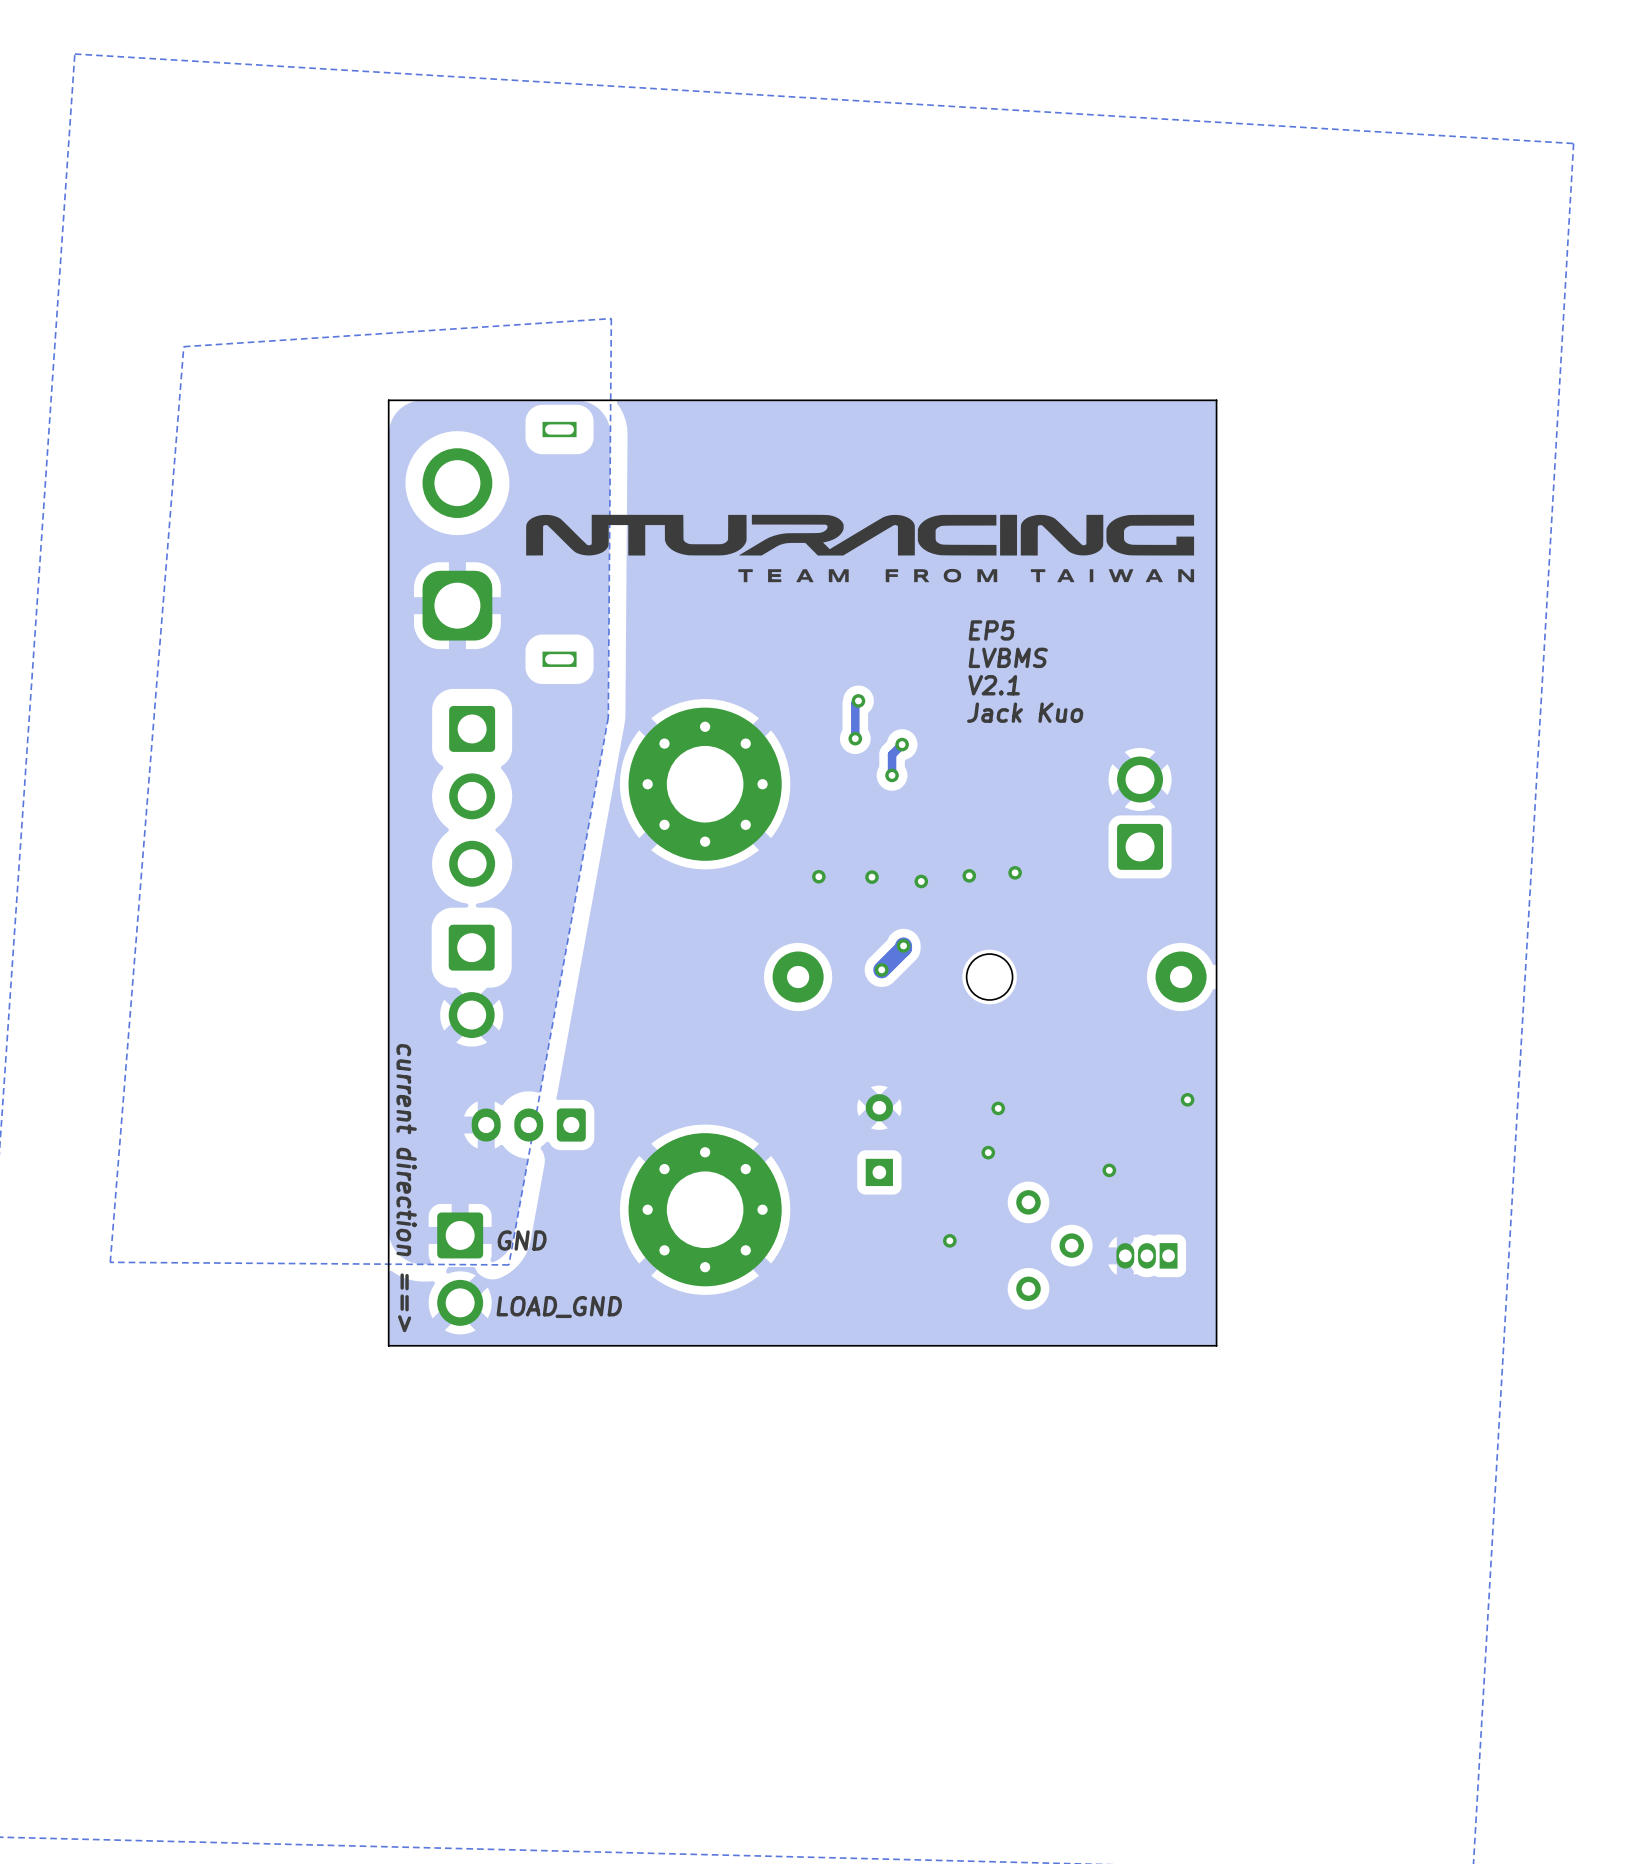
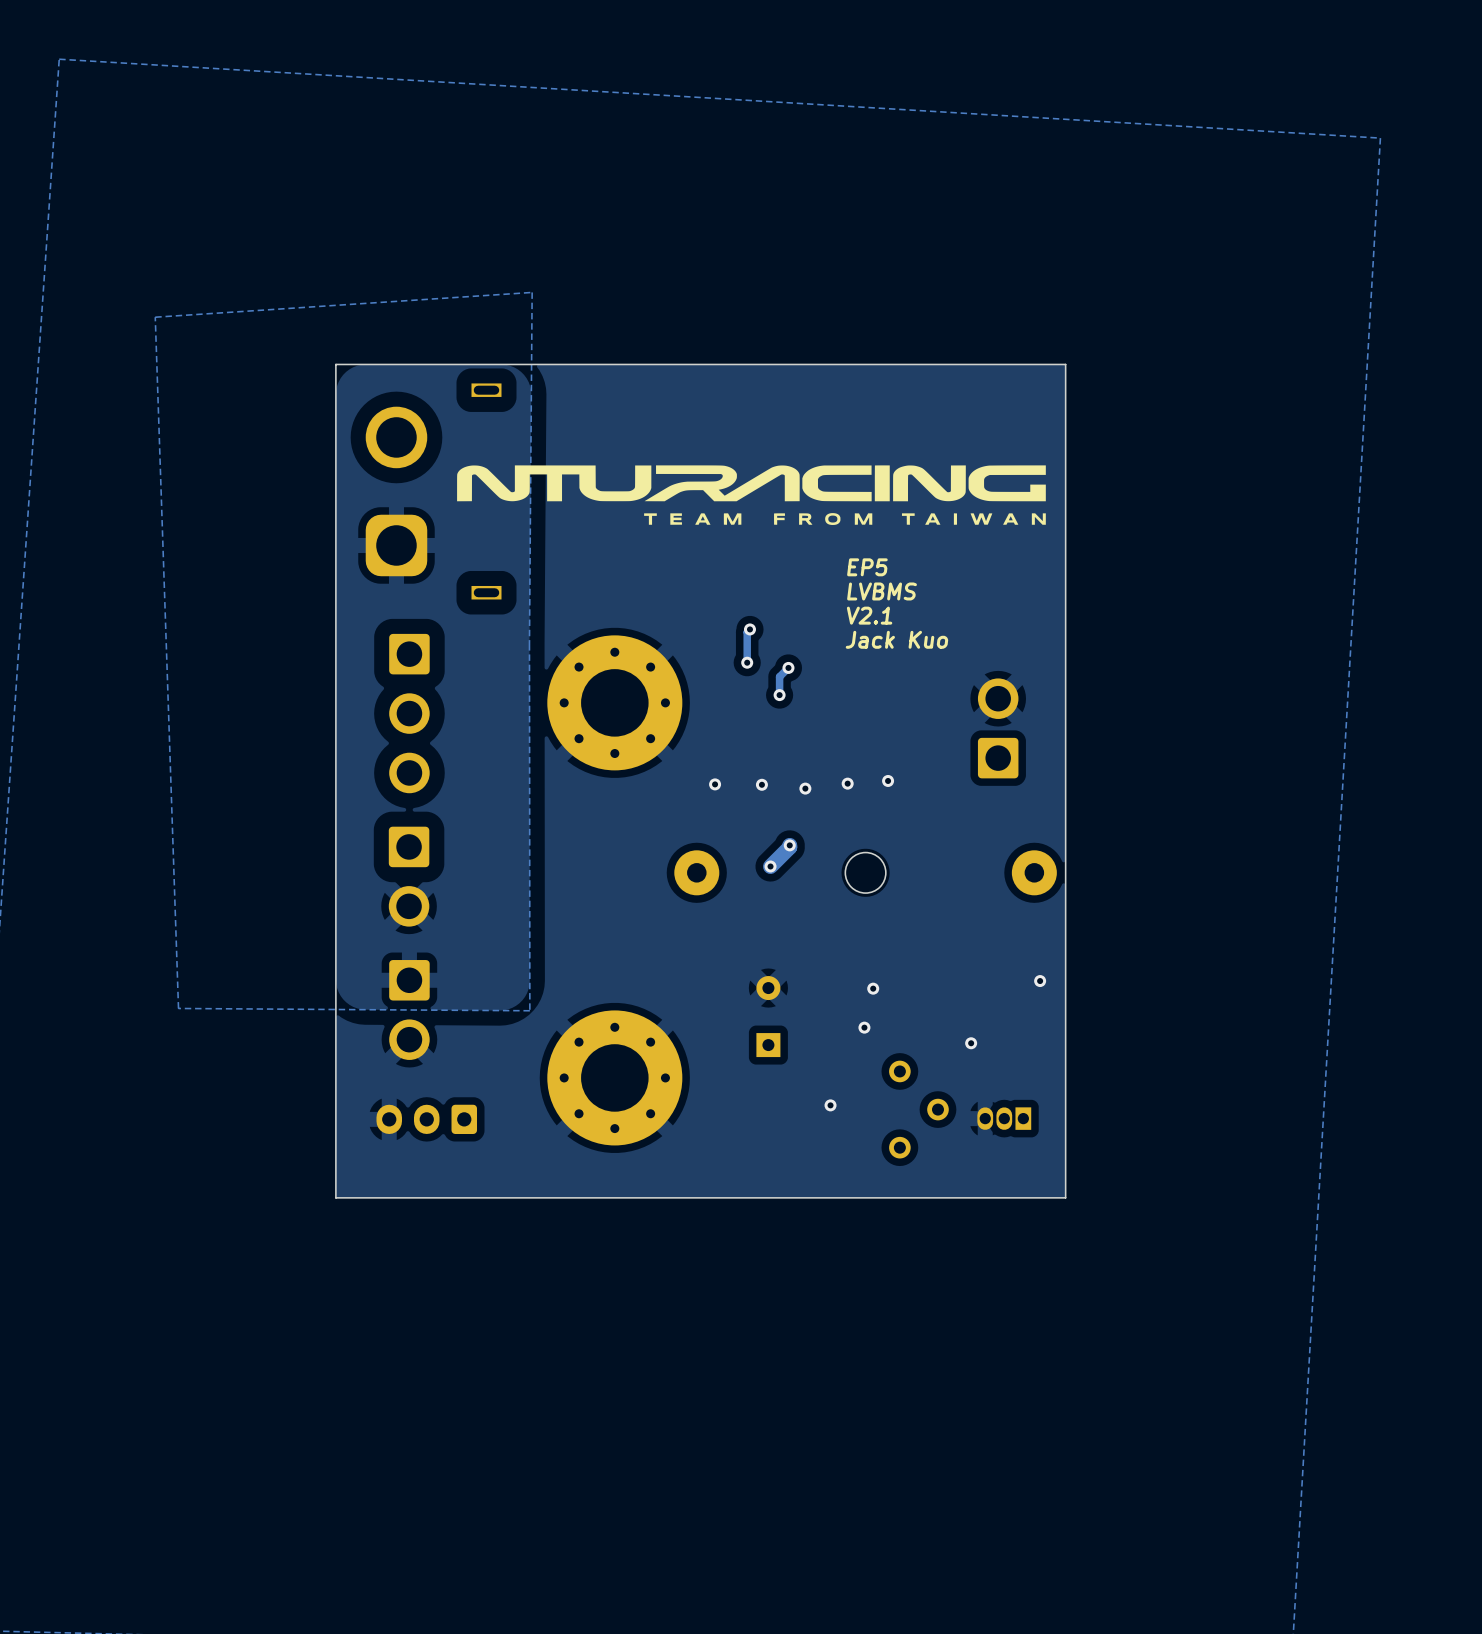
zone outline: (183, 346) (110, 1262) (508, 1264) (608, 717) -> (155, 317) (178, 1008) (529, 1010) (529, 644)
part position: (528, 1125) -> (426, 1119)
text: current direction ==> (406, 1188) -> none
text: GND (522, 1240) -> none
part position: (460, 1269) -> (409, 1009)
text: LOAD_GND (559, 1307) -> none

